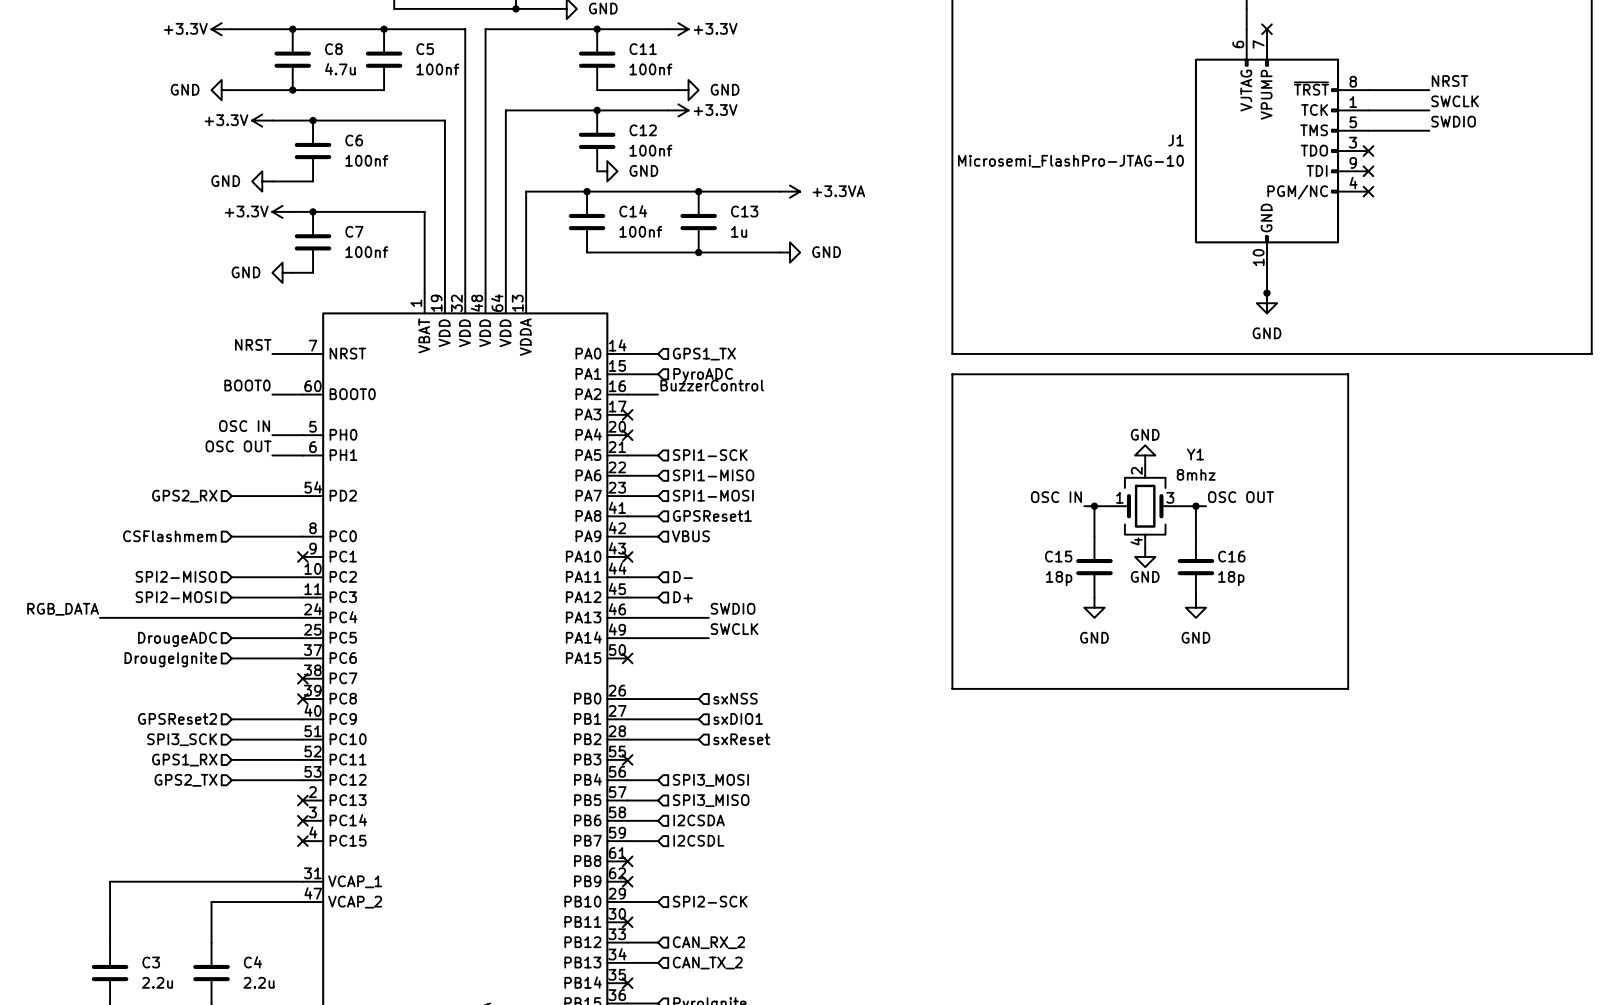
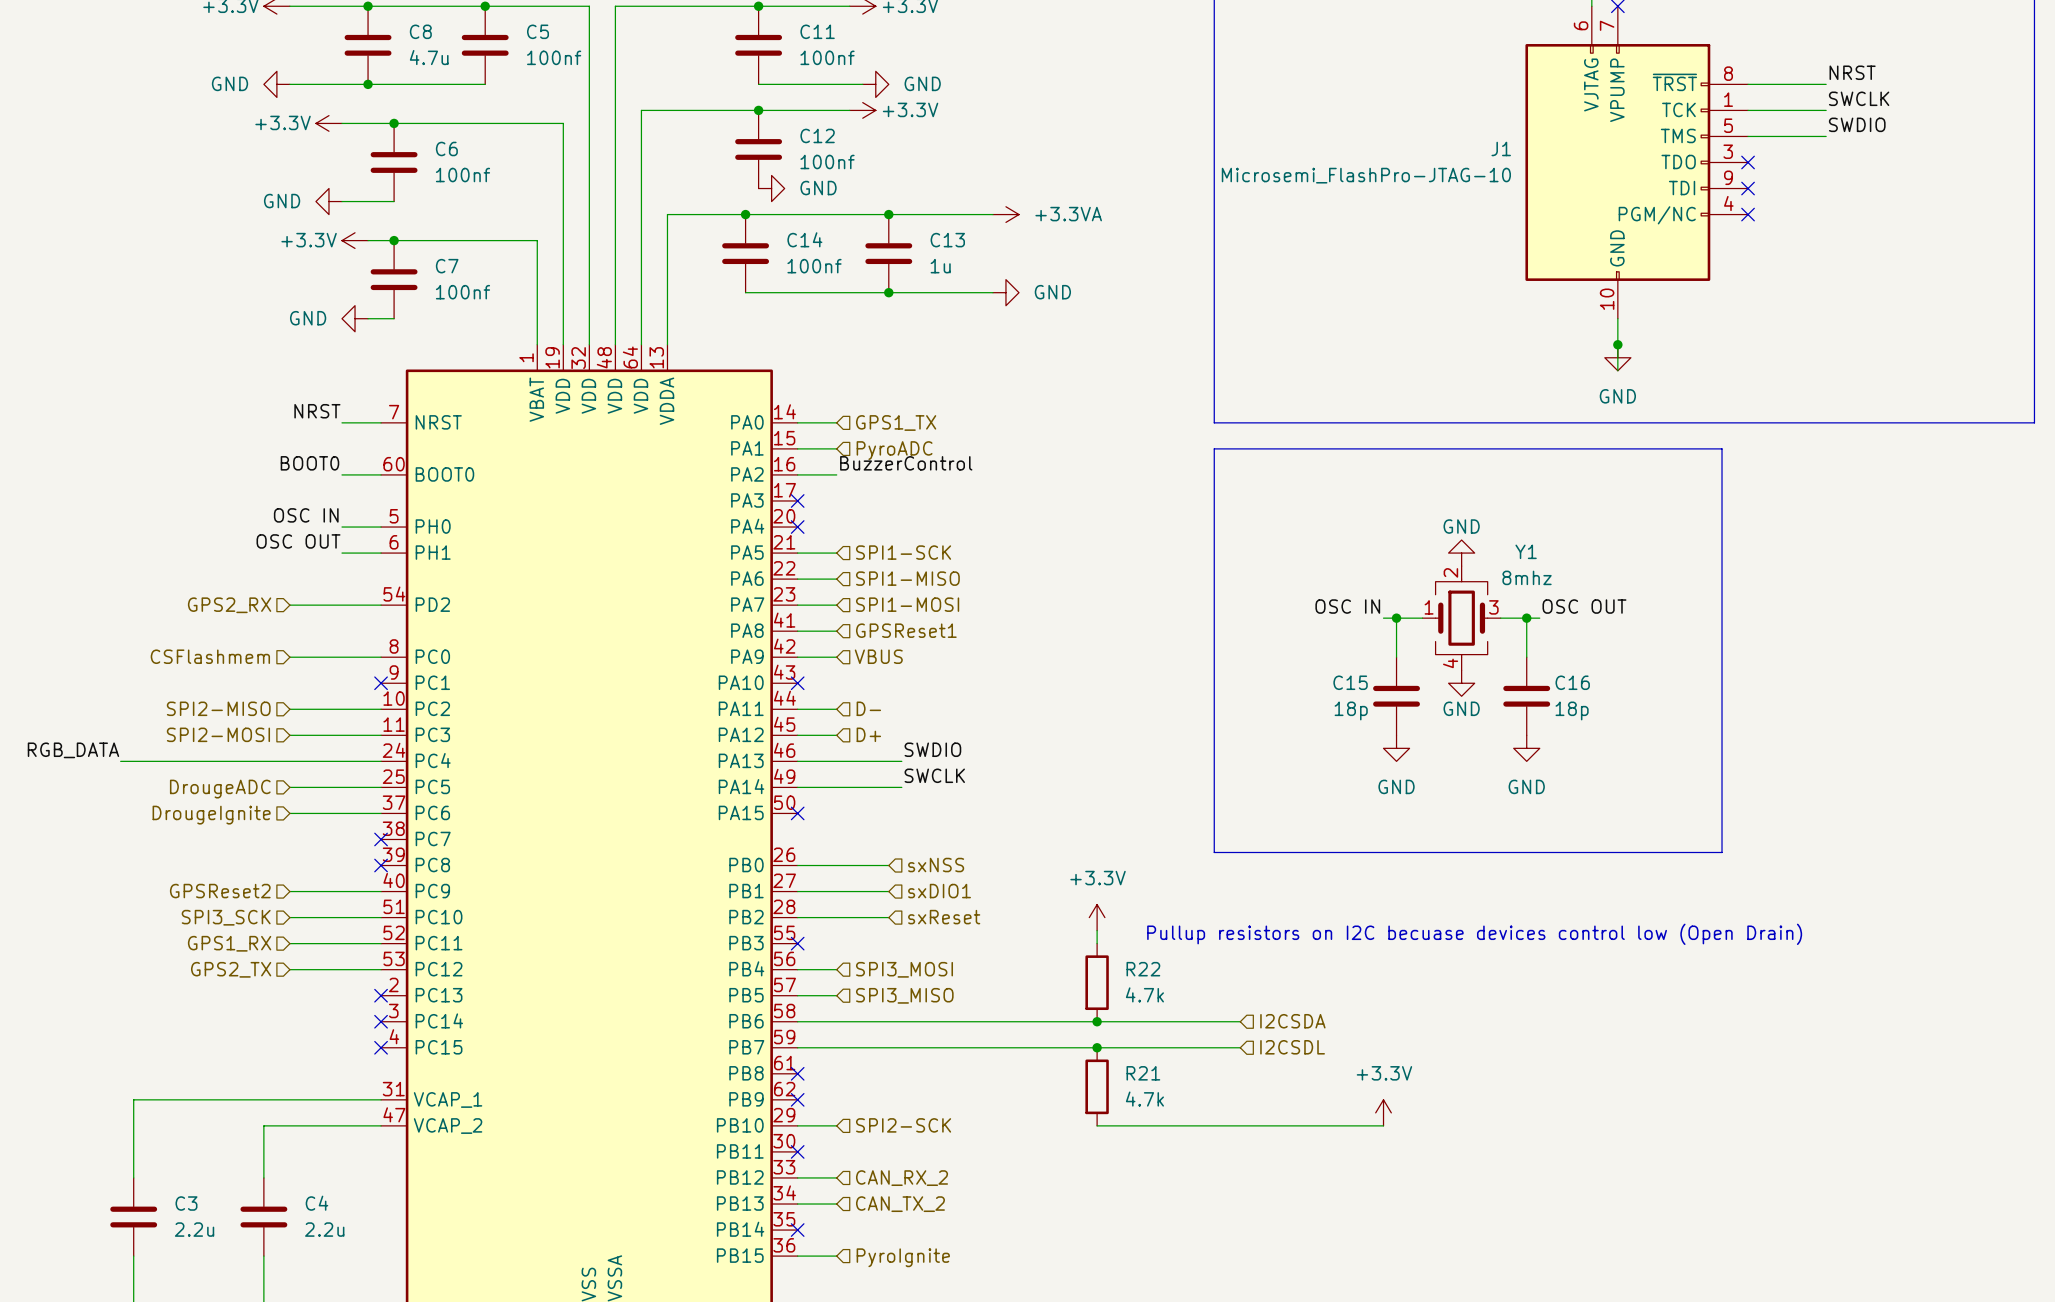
power symbol: none -> +3.3V (1097, 917)
wire: none -> (1097, 930) (1097, 943)
text: none -> Pullup resistors on I2C becuase devices control low (Open Drain) (1474, 934)
R22: none -> 4.7k (1097, 982)
wire: none -> (836, 1021) (1240, 1021)
hierarchical label: I2CSDA (699, 820) -> none
junction: none -> (1097, 1021)
hierarchical label: none -> I2CSDA (1292, 1021)
hierarchical label: I2CSDL (698, 840) -> none
hierarchical label: none -> I2CSDL (1292, 1047)
wire: none -> (836, 1047) (1240, 1047)
junction: none -> (1097, 1047)
R21: none -> 4.7k (1097, 1086)
power symbol: none -> +3.3V (1383, 1112)
wire: none -> (1097, 1125) (1383, 1125)

